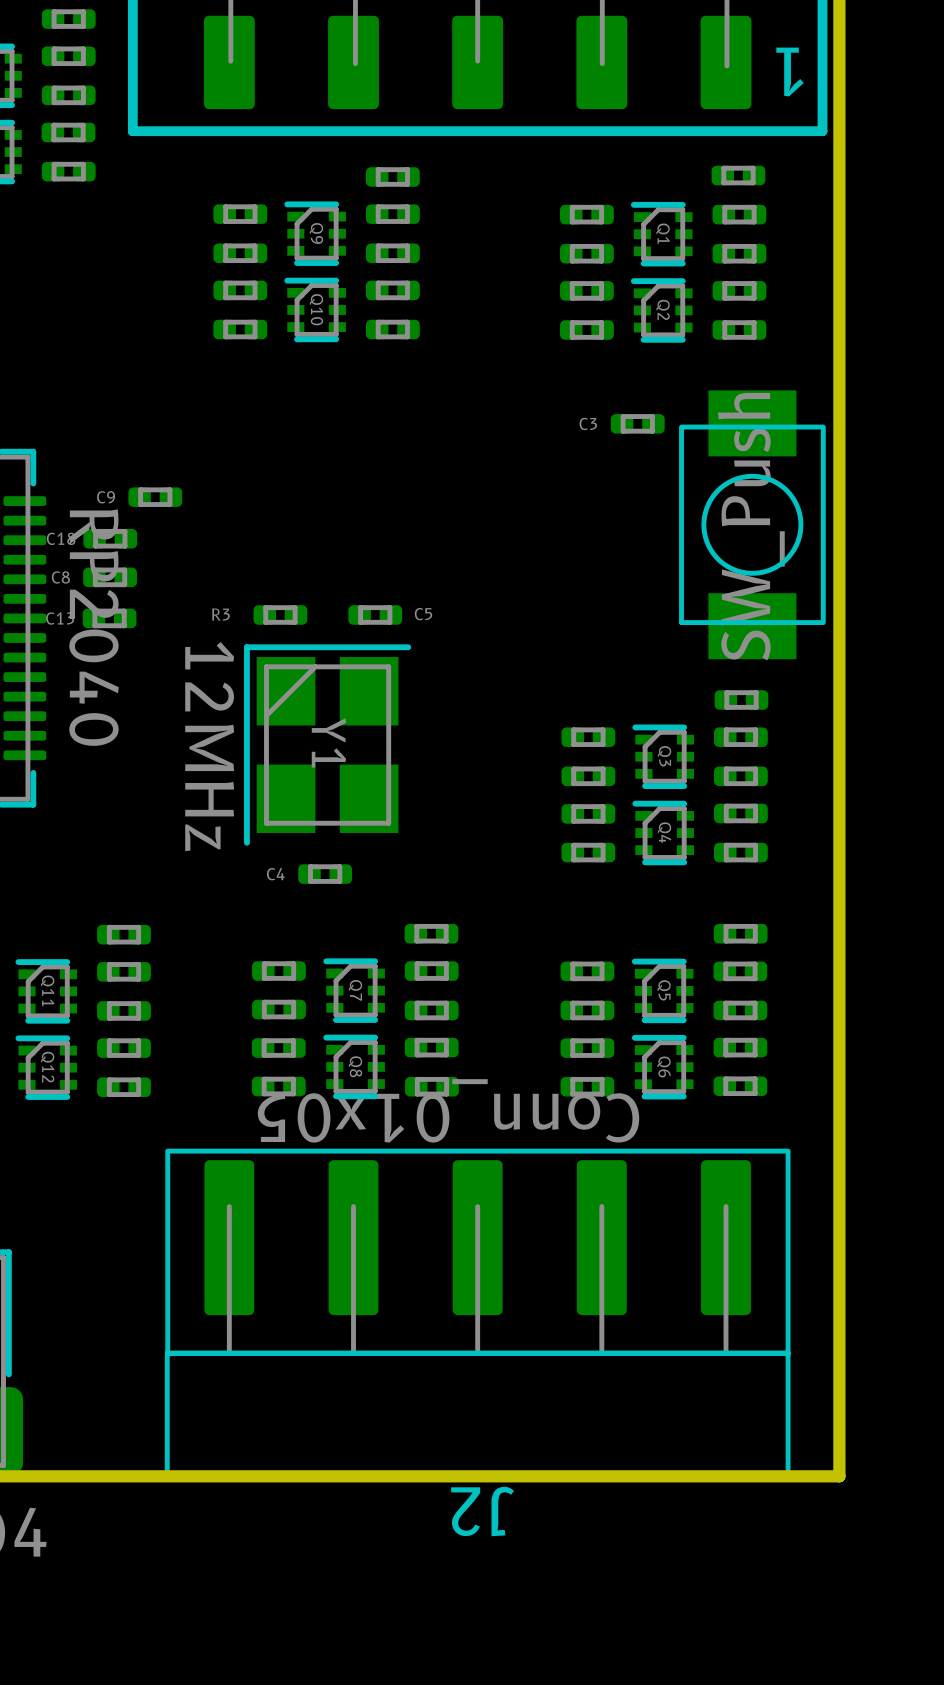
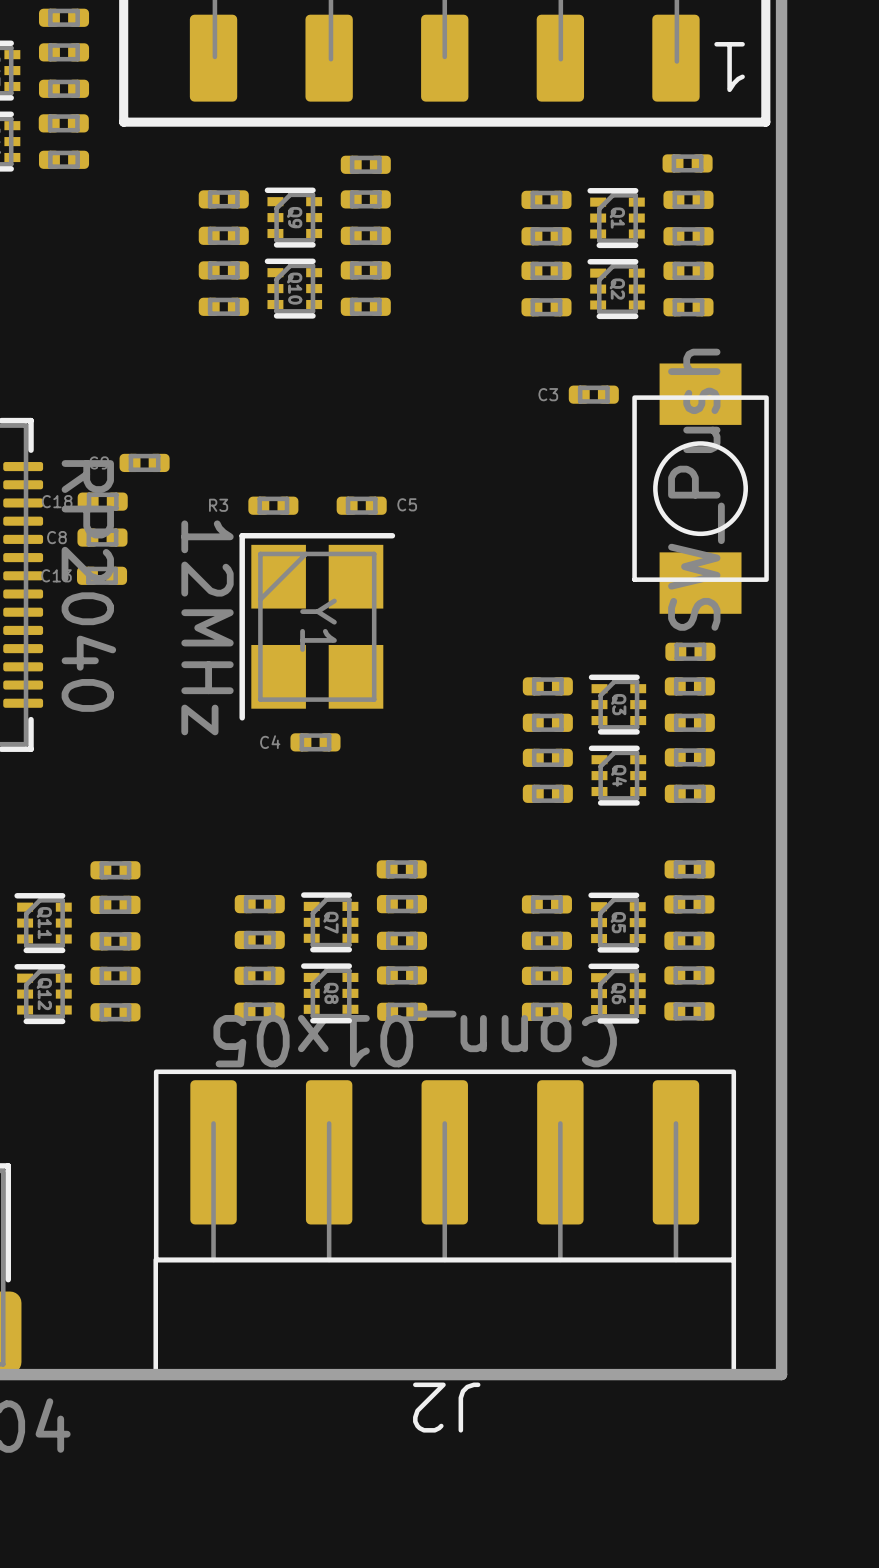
R3 position: (280, 614) -> (273, 505)
C5 position: (375, 614) -> (361, 505)
Y1 position: (327, 745) -> (317, 626)
C4 position: (325, 874) -> (315, 742)

